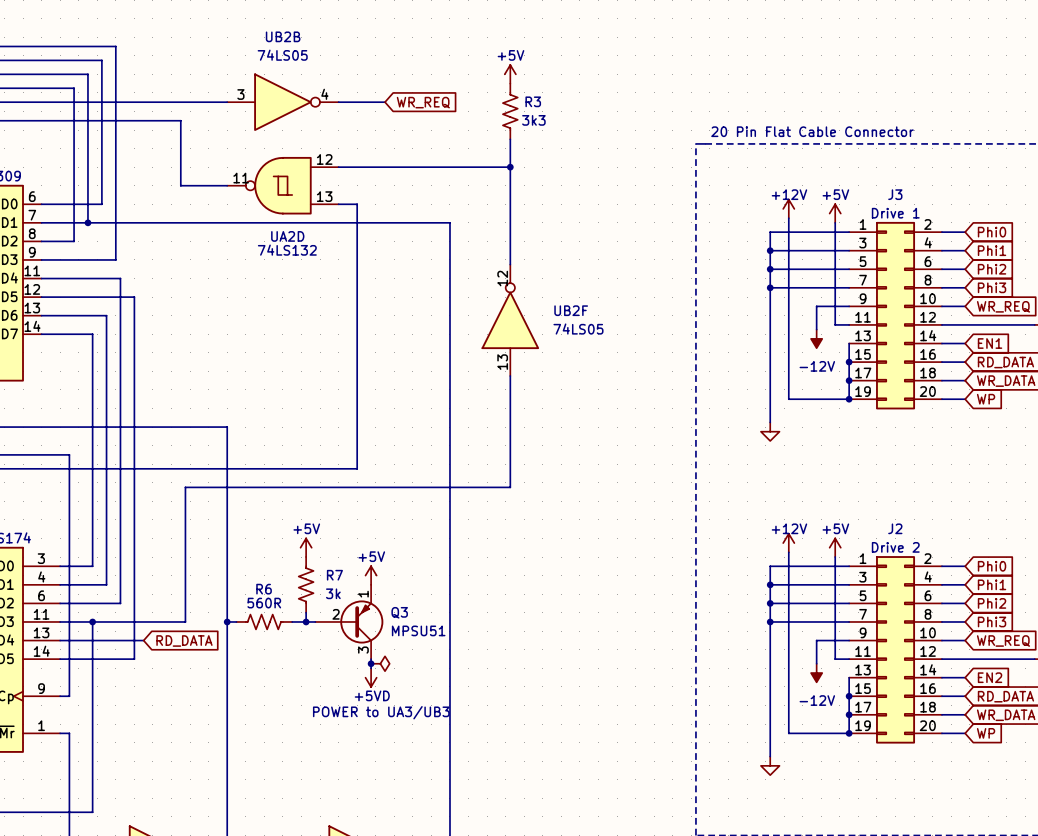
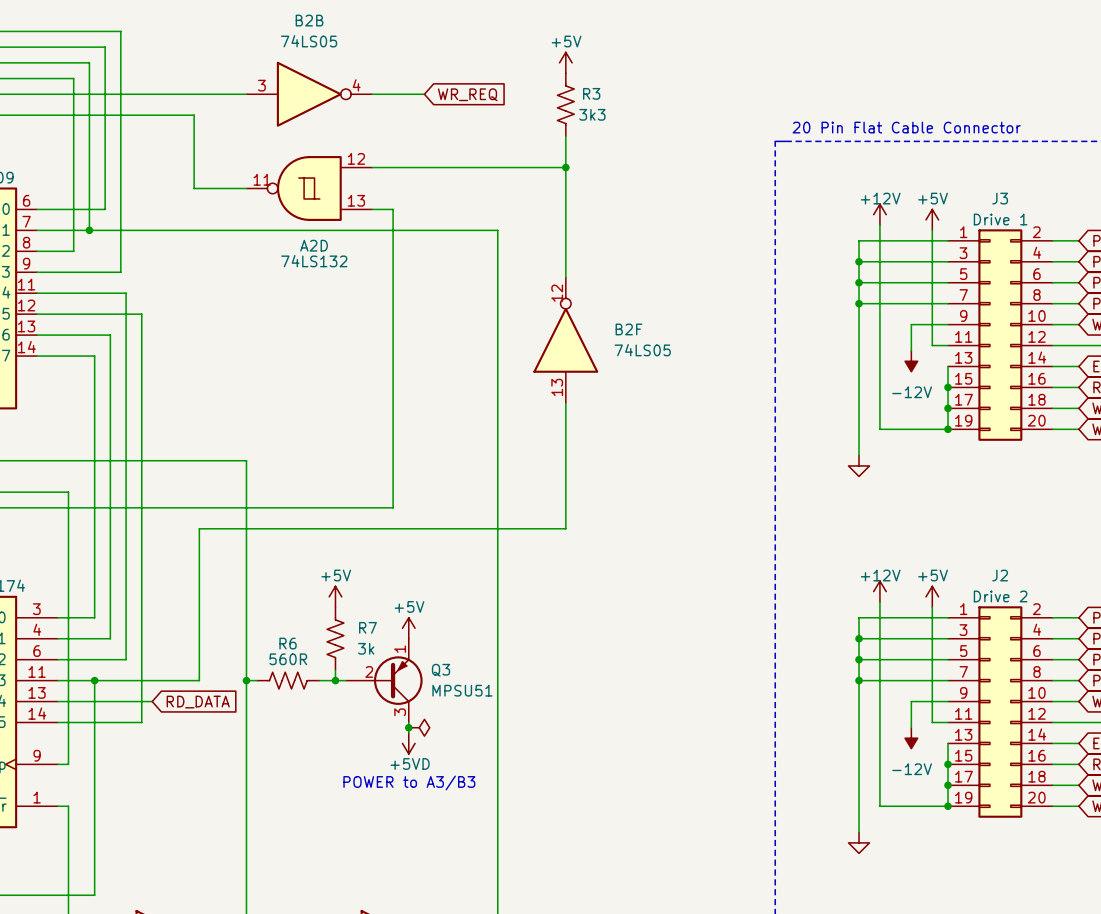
UB2B name: UB2B (283, 36) -> B2B (309, 20)
UA2D name: UA2D (287, 236) -> A2D (314, 245)
UB2F name: UB2F (571, 310) -> B2F (628, 329)
text: POWER to UA3/UB3 (381, 712) -> POWER to A3/B3 (409, 782)

